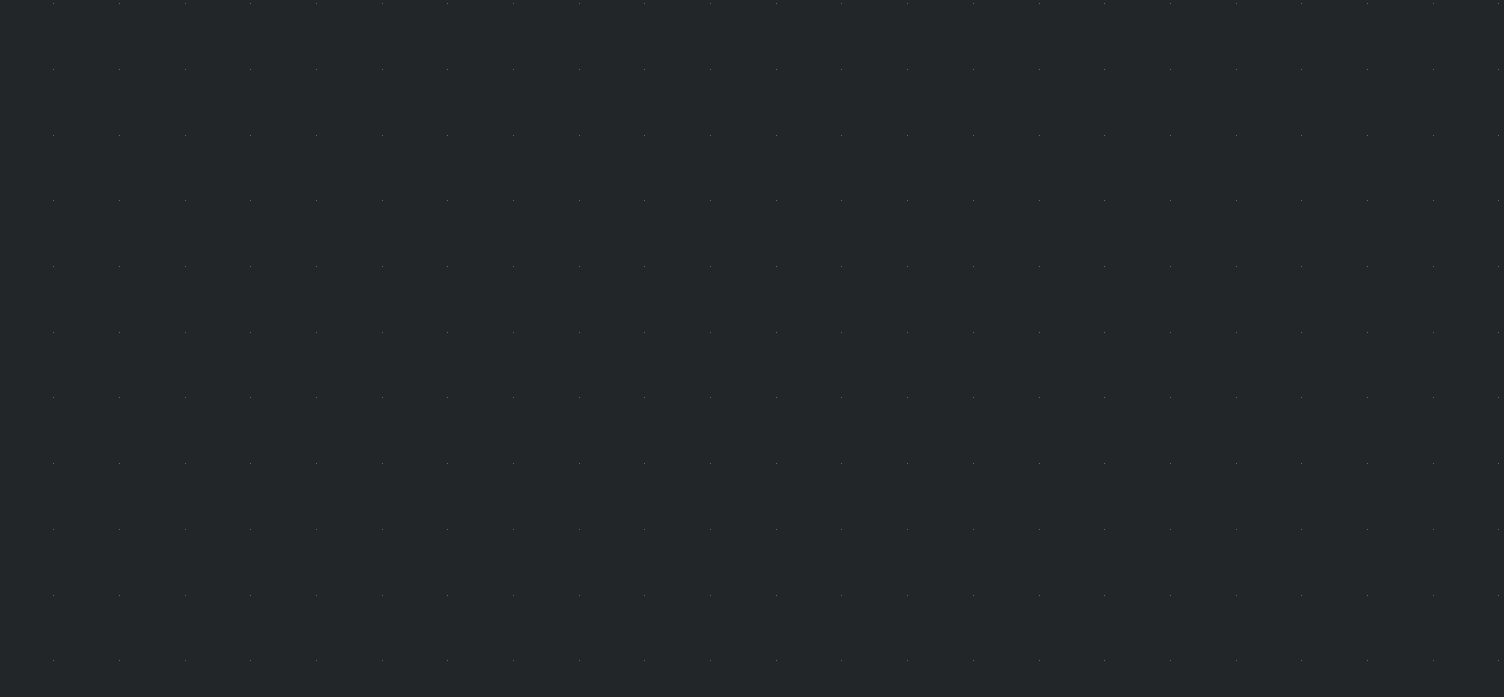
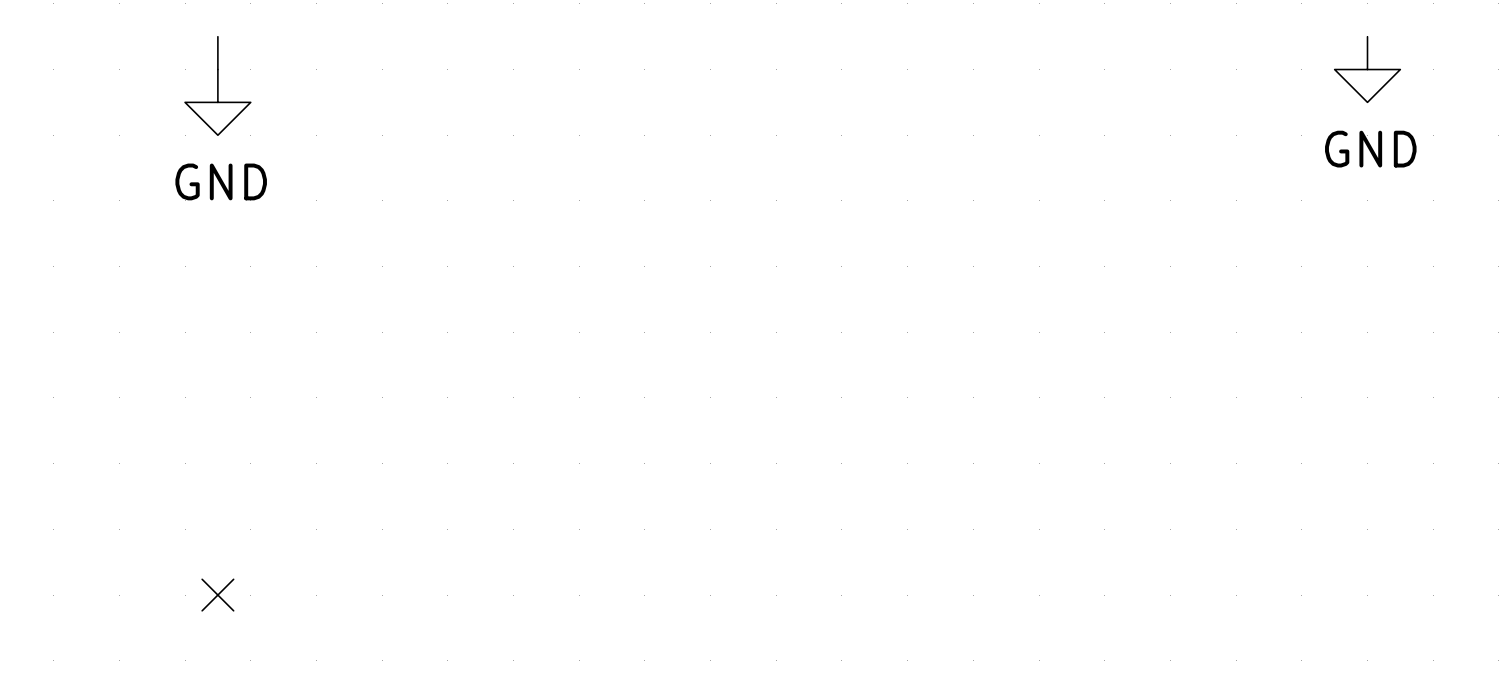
wire: none -> (217, 36) (217, 69)
power symbol: none -> GND (1367, 69)
power symbol: none -> GND (217, 102)
no-connect mark: none -> (217, 595)

